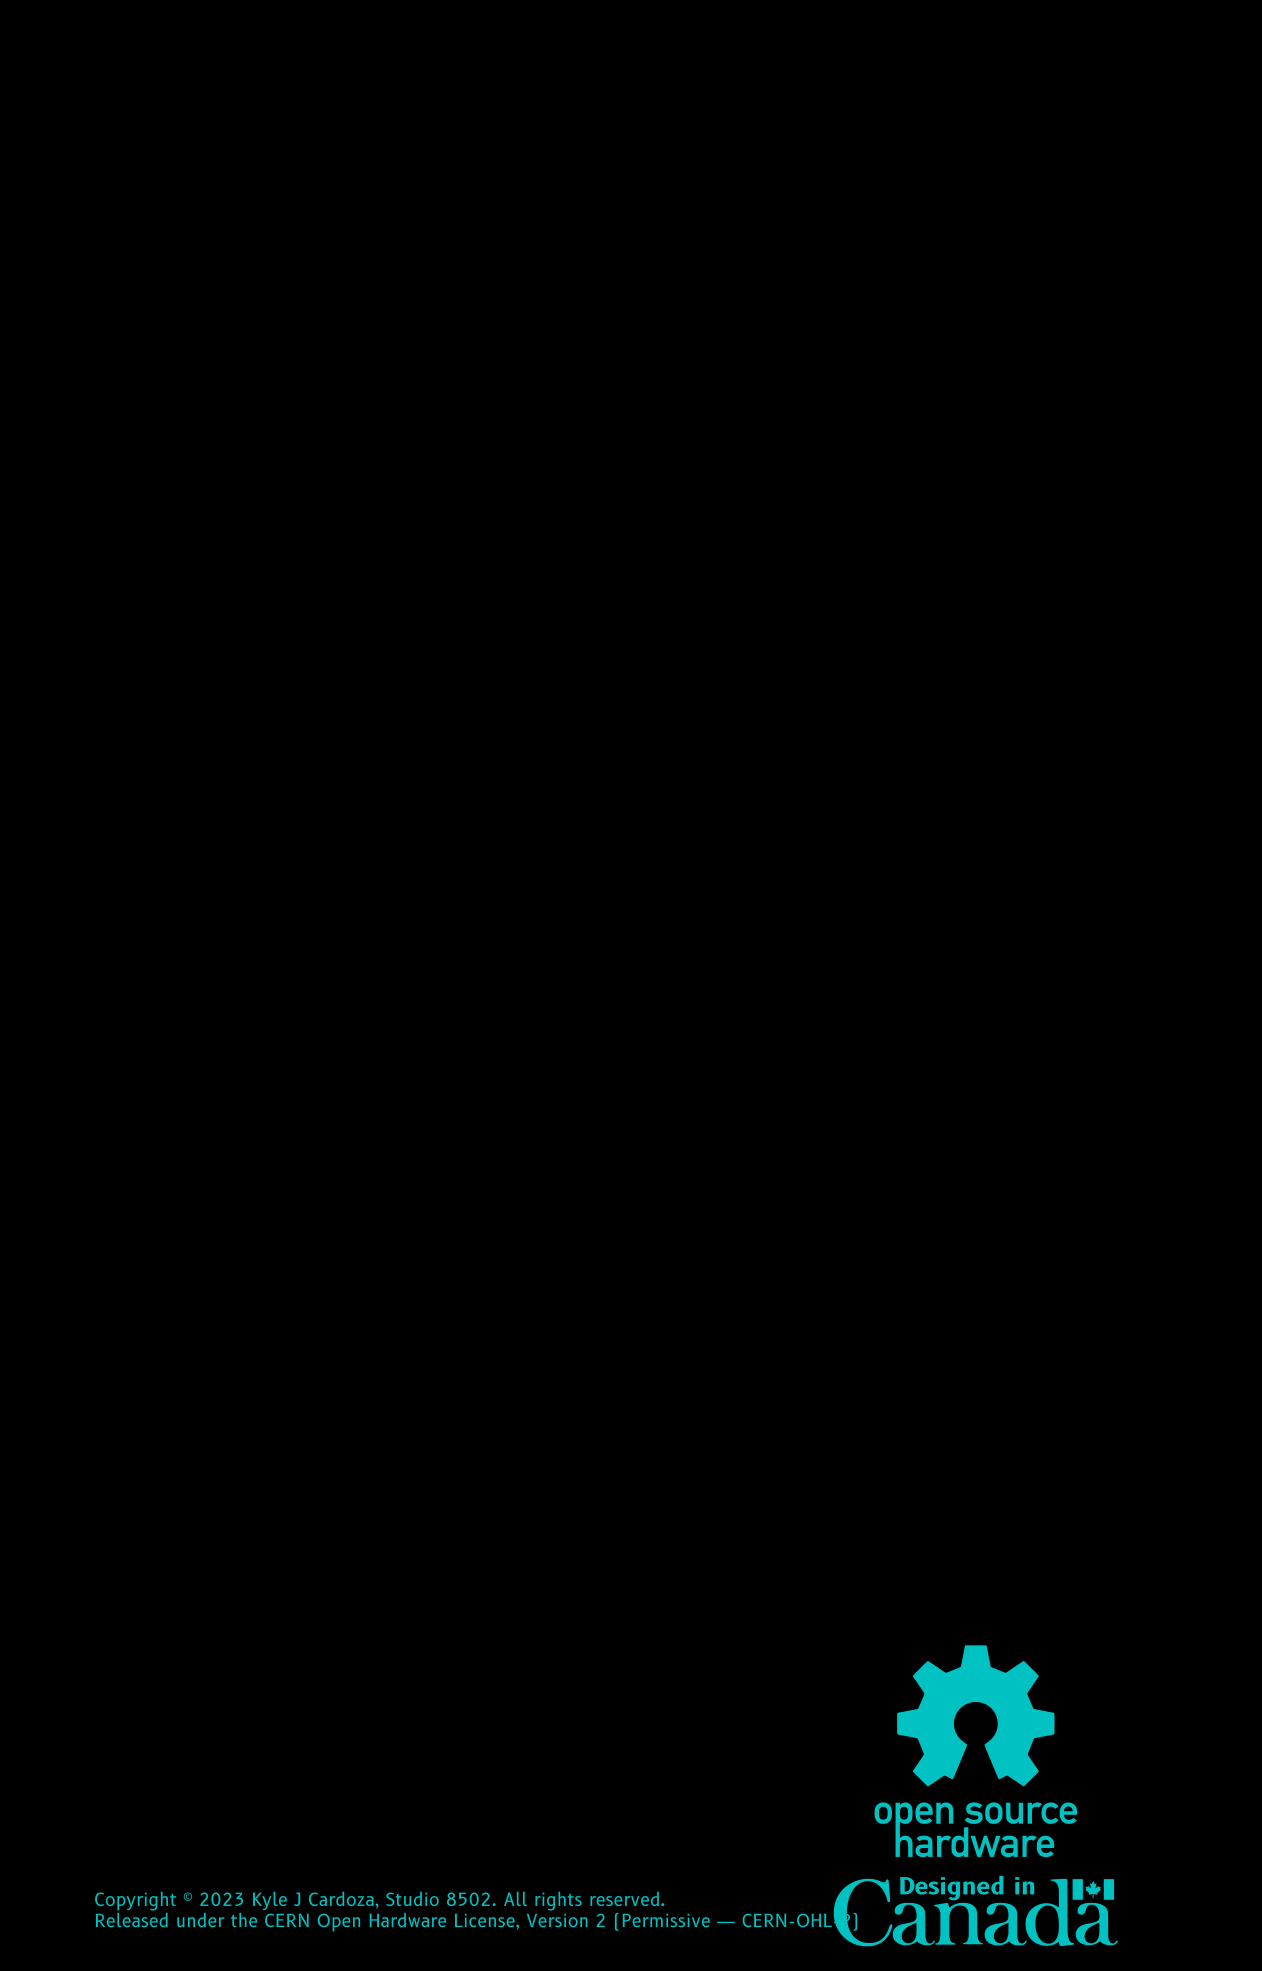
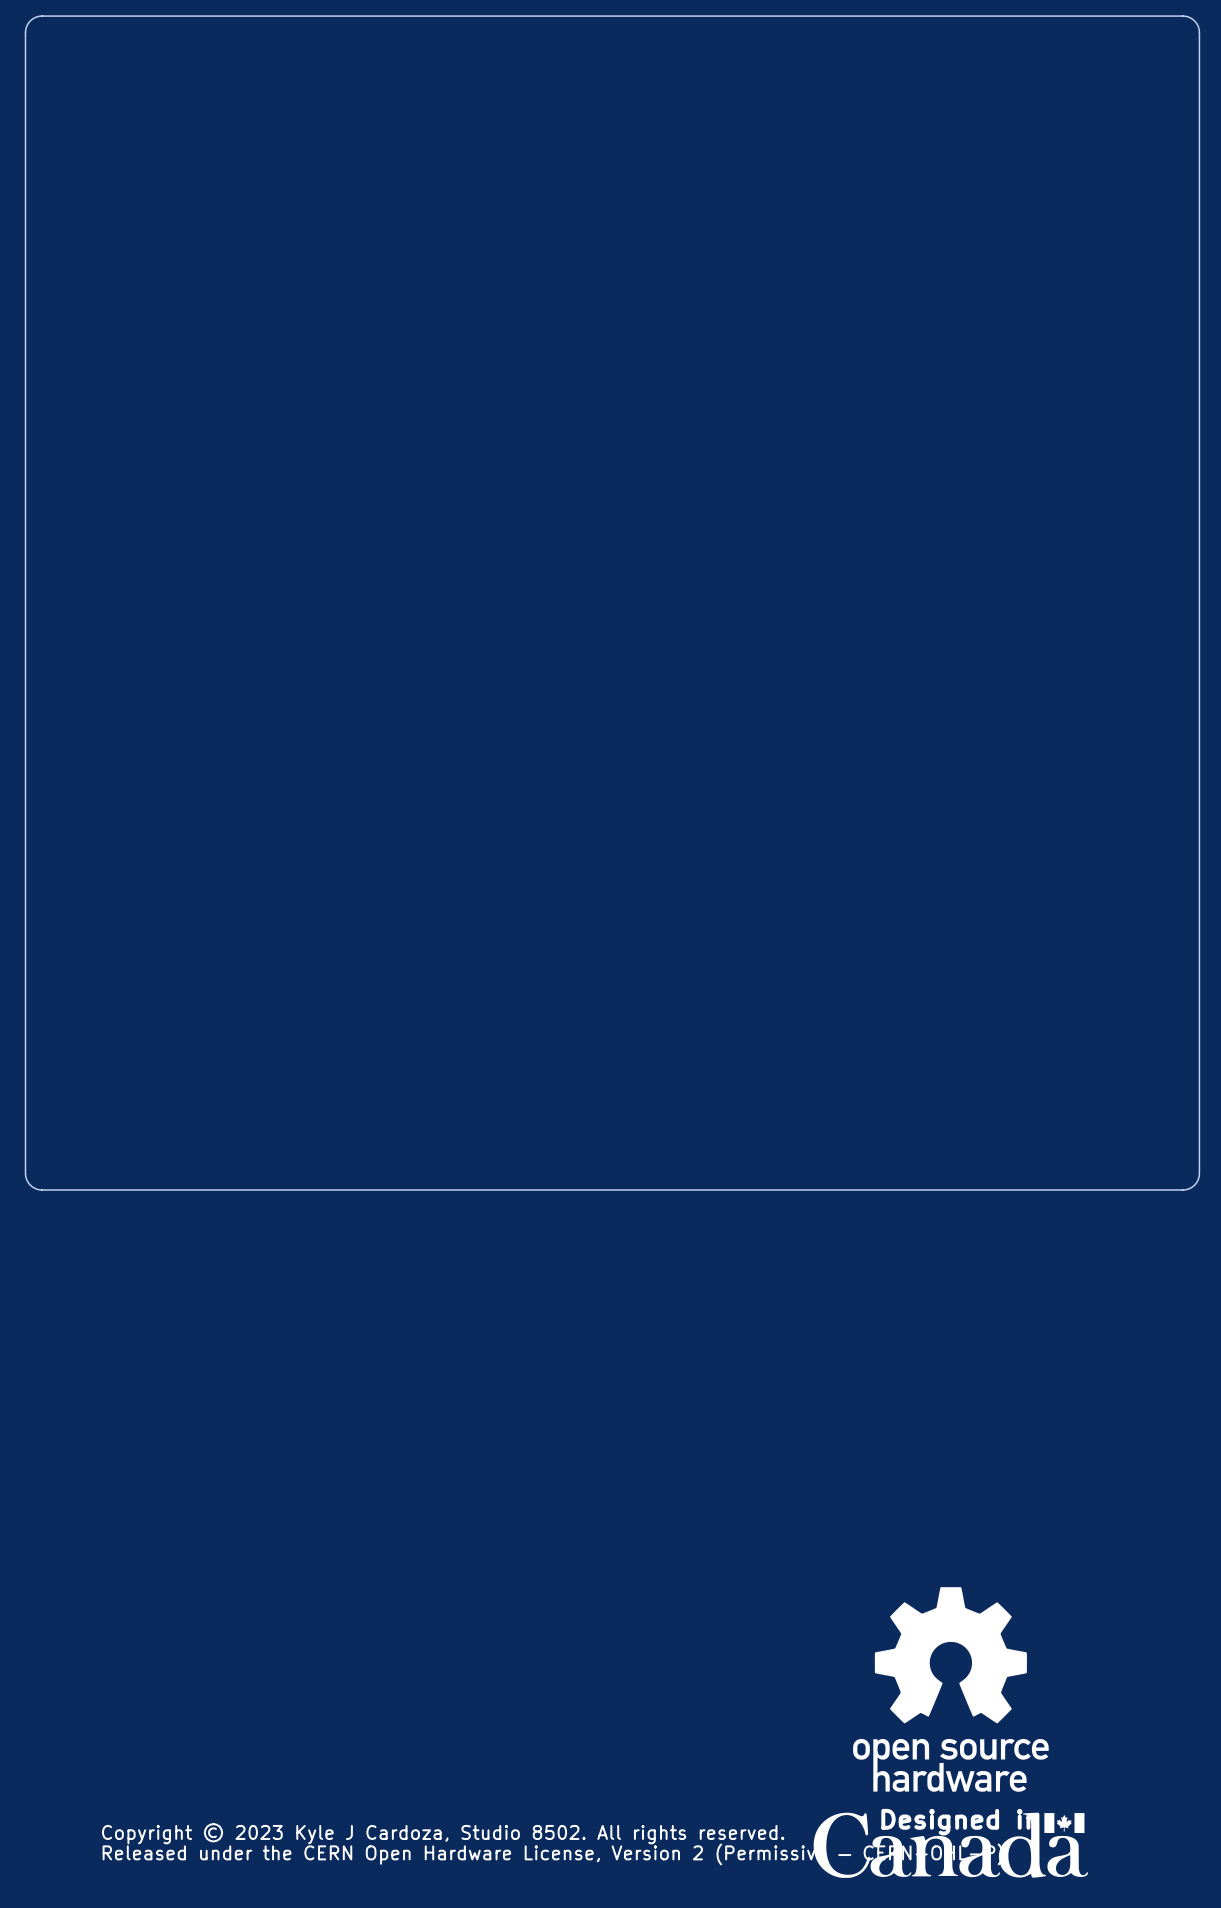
board edge: none -> (42, 16) (1182, 16) (1194, 20) (1199, 32) (1199, 1173) (1194, 1185) (1182, 1190) (42, 1190) (30, 1185) (25, 1173) (25, 32) (30, 20) (42, 16)

